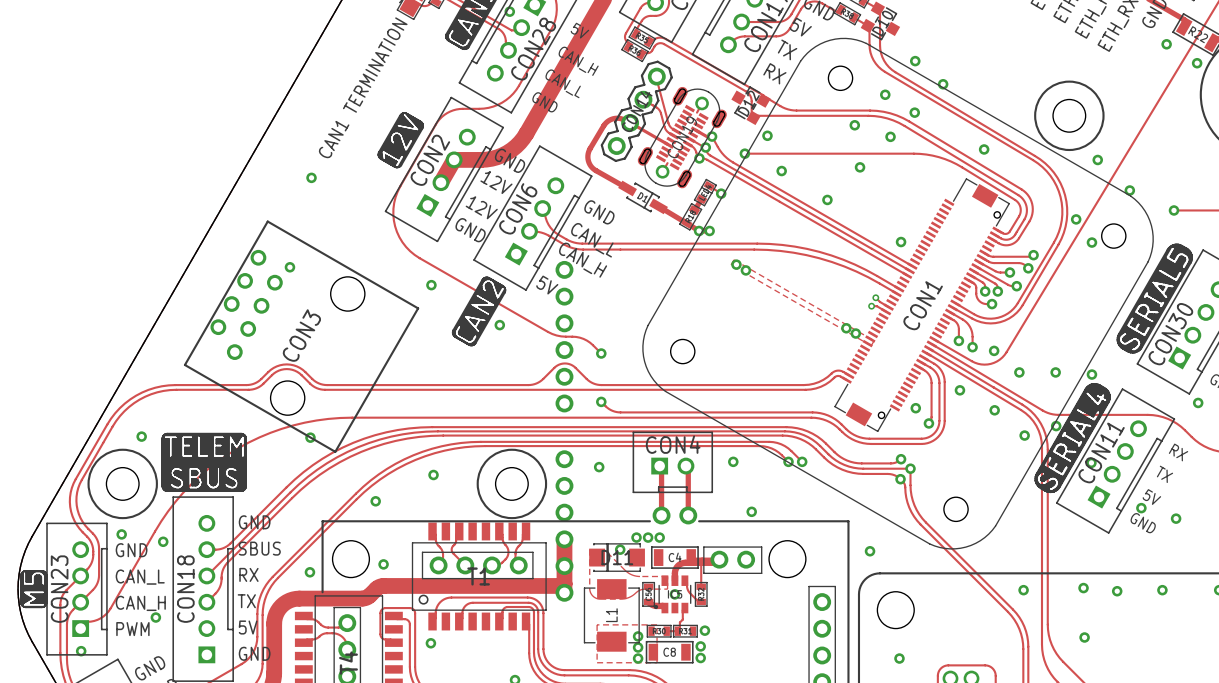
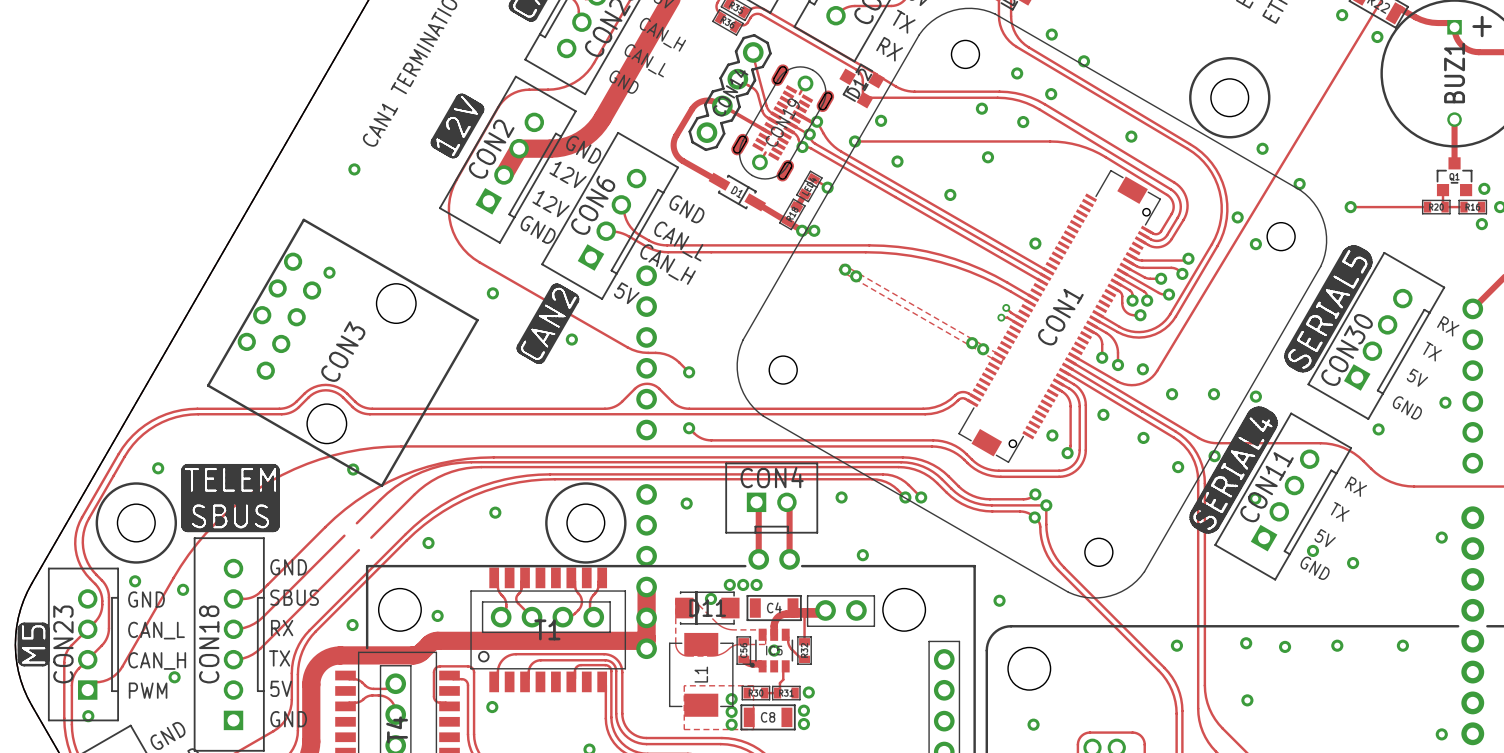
track: (437, 431) (414, 432) (380, 439) (347, 451) (326, 463) (298, 484) (206, 575) -> (500, 462) (451, 463) (421, 472) (395, 486) (356, 523)
track: (443, 435) (407, 438) (384, 443) (350, 456) (319, 475) (292, 498) (226, 563) (222, 571) (219, 588) (206, 602) -> (358, 550) (256, 651) (243, 658) (233, 659)
track: none -> (506, 467) (466, 468) (438, 477) (419, 489) (371, 537)
track: none -> (344, 535) (258, 620) (244, 627) (233, 629)

